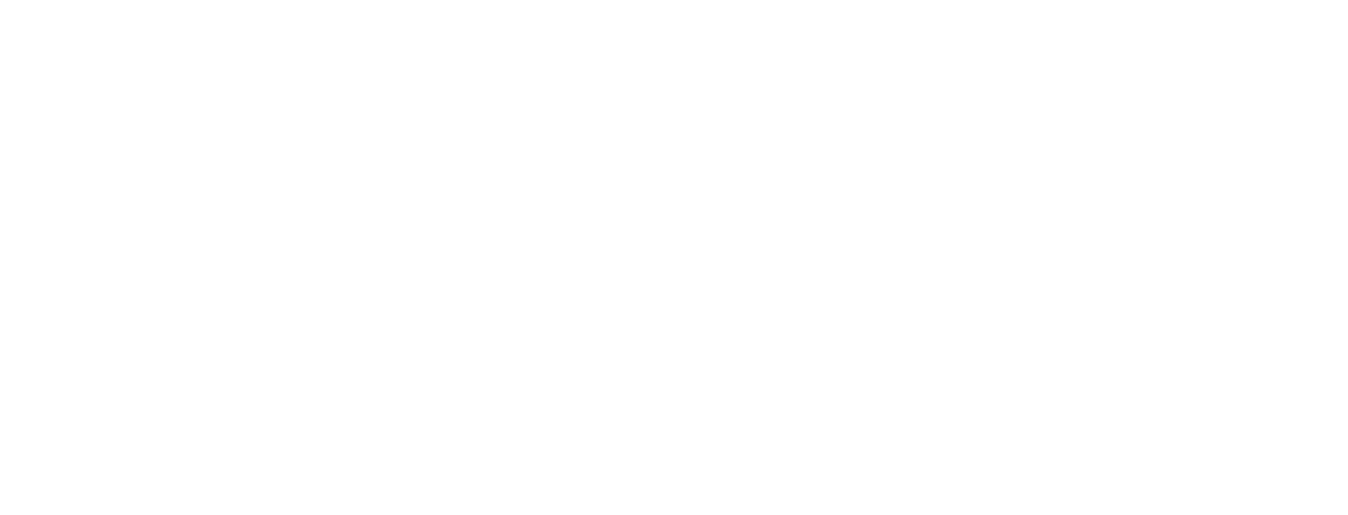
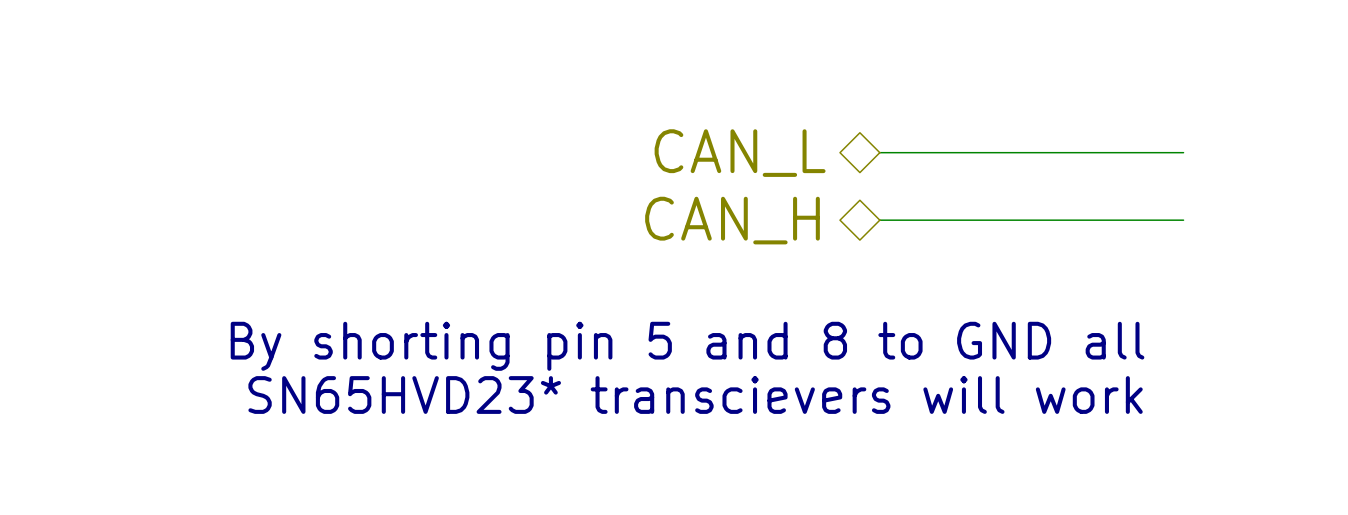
wire: none -> (879, 152) (1183, 152)
hierarchical label: none -> CAN_L (740, 153)
hierarchical label: none -> CAN_H (732, 220)
wire: none -> (879, 220) (1183, 220)
text: none -> By shorting pin 5 and 8 to GND all (687, 346)
text: none -> SN65HVD23* transcievers will work (695, 395)

